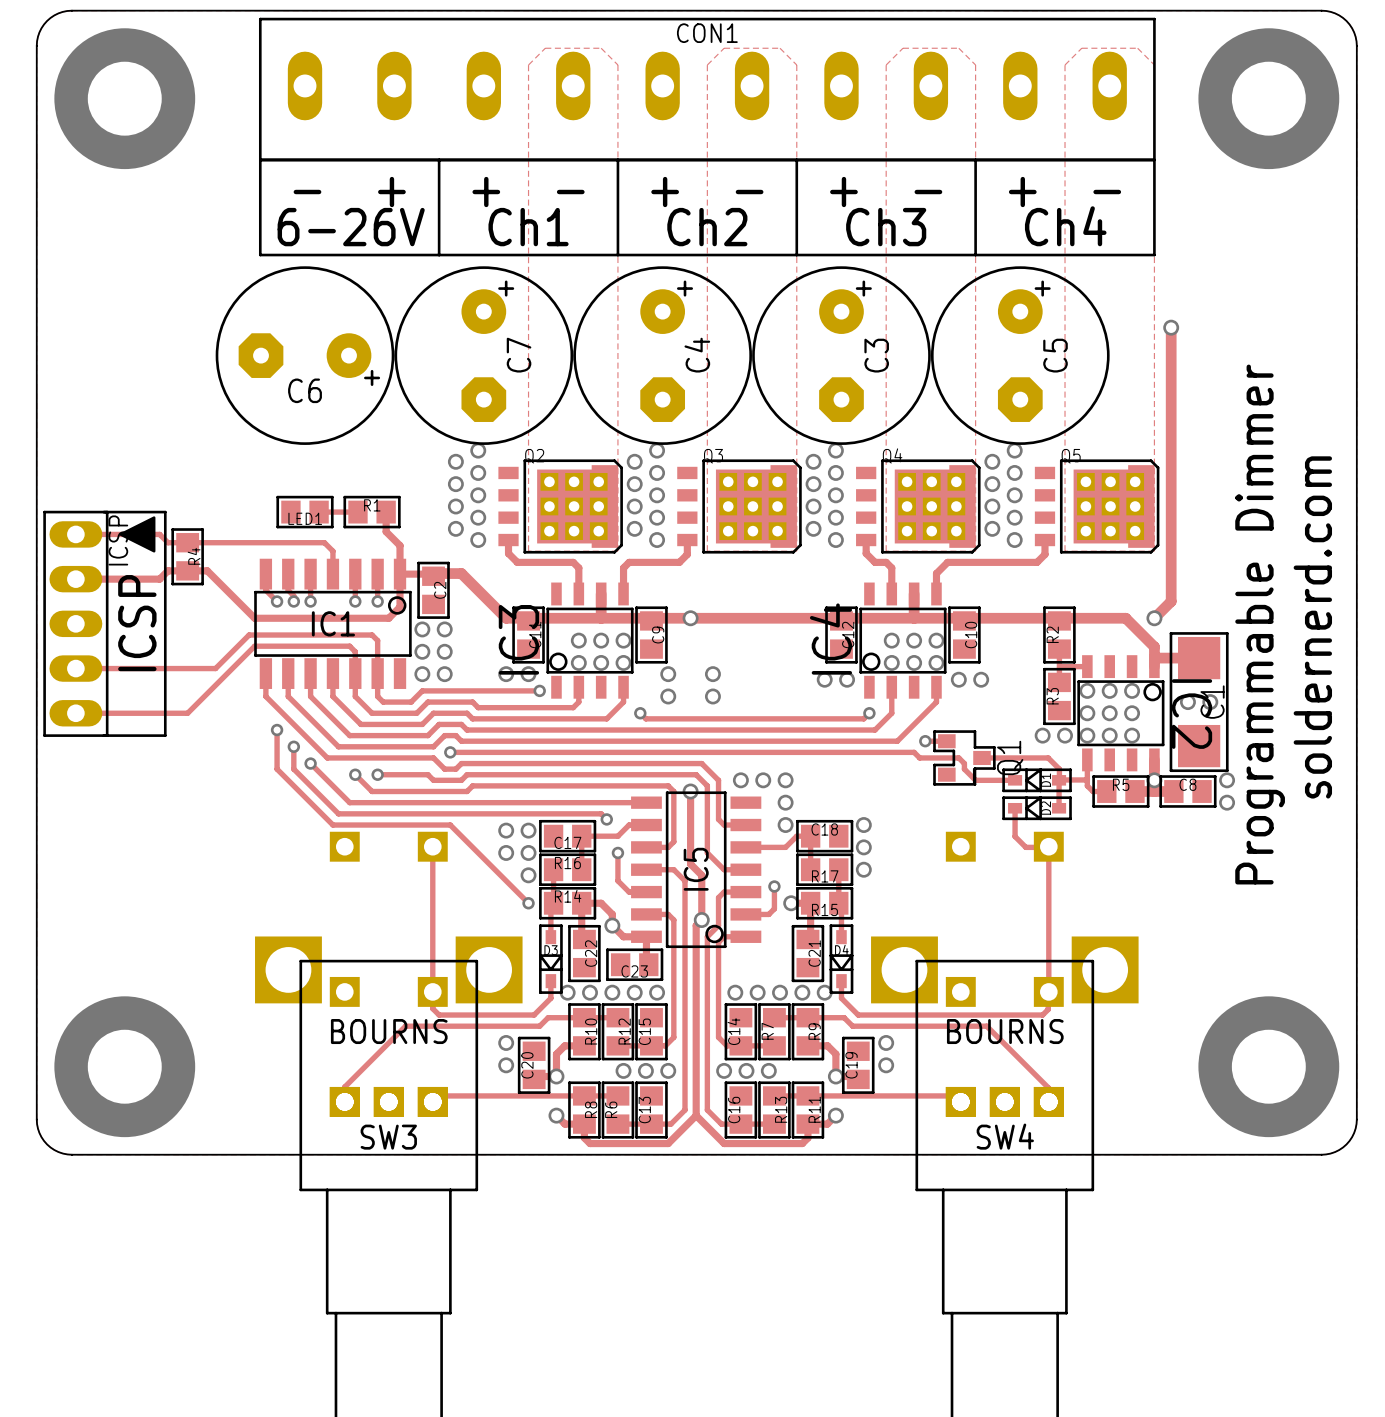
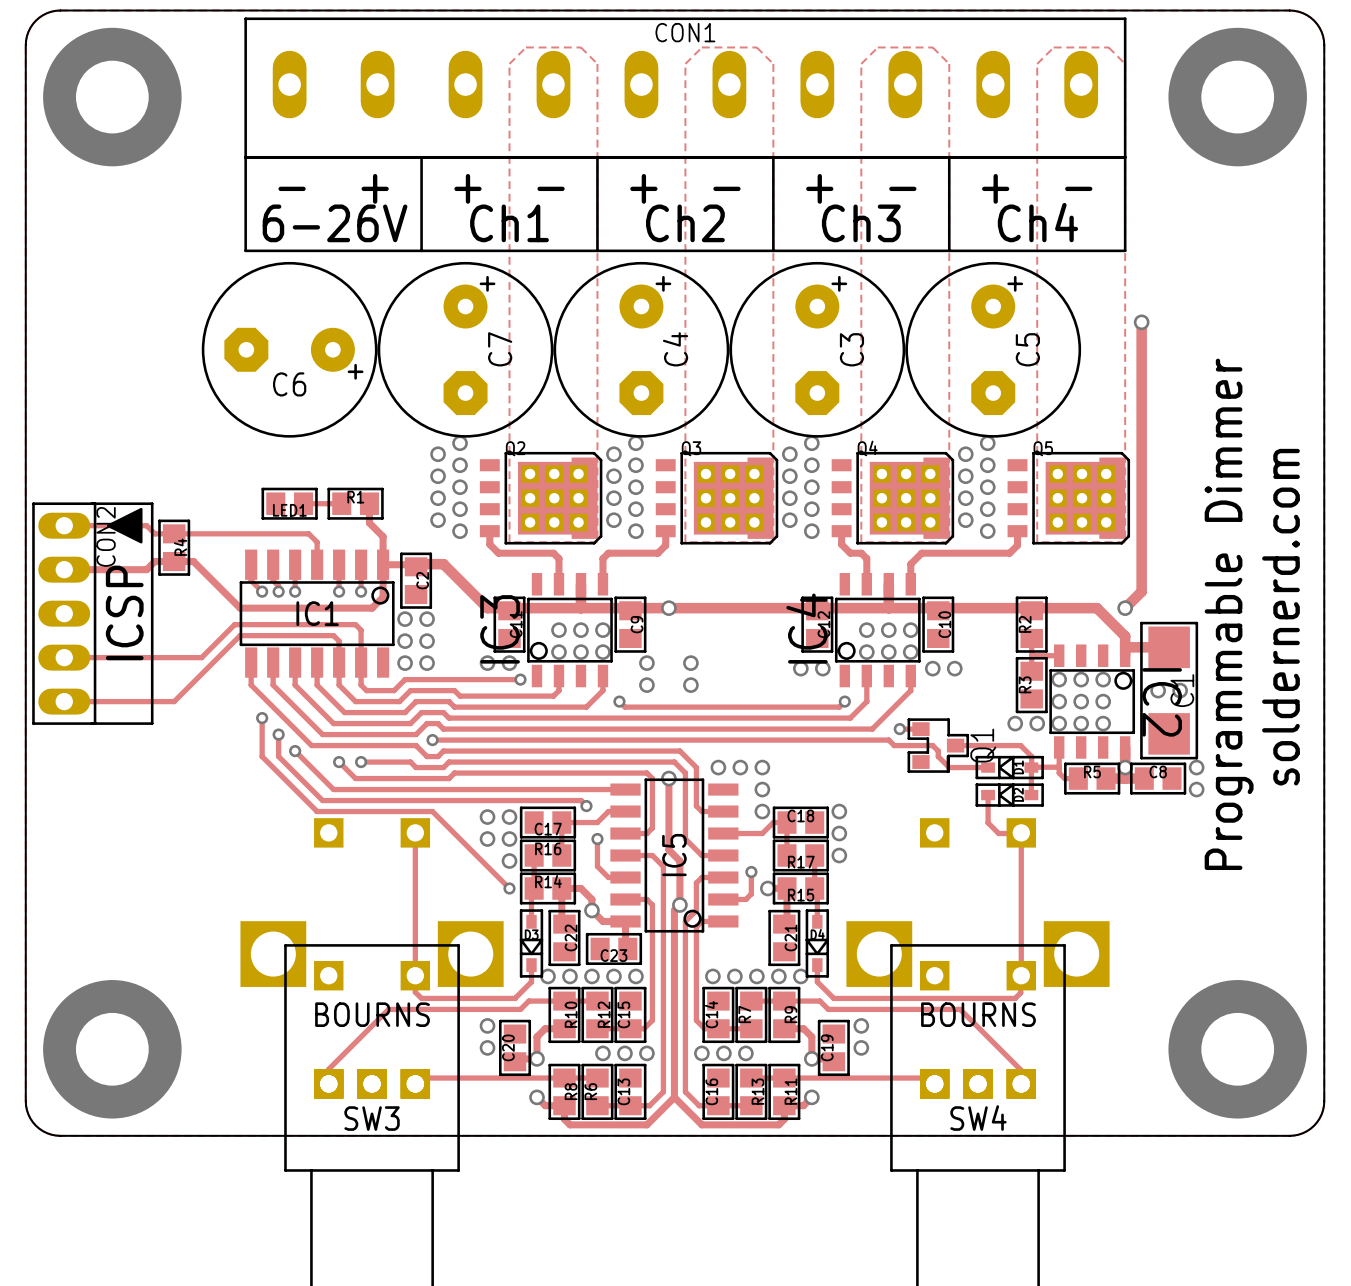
ICSP name: ICSP (118, 540) -> CON2 (106, 536)

